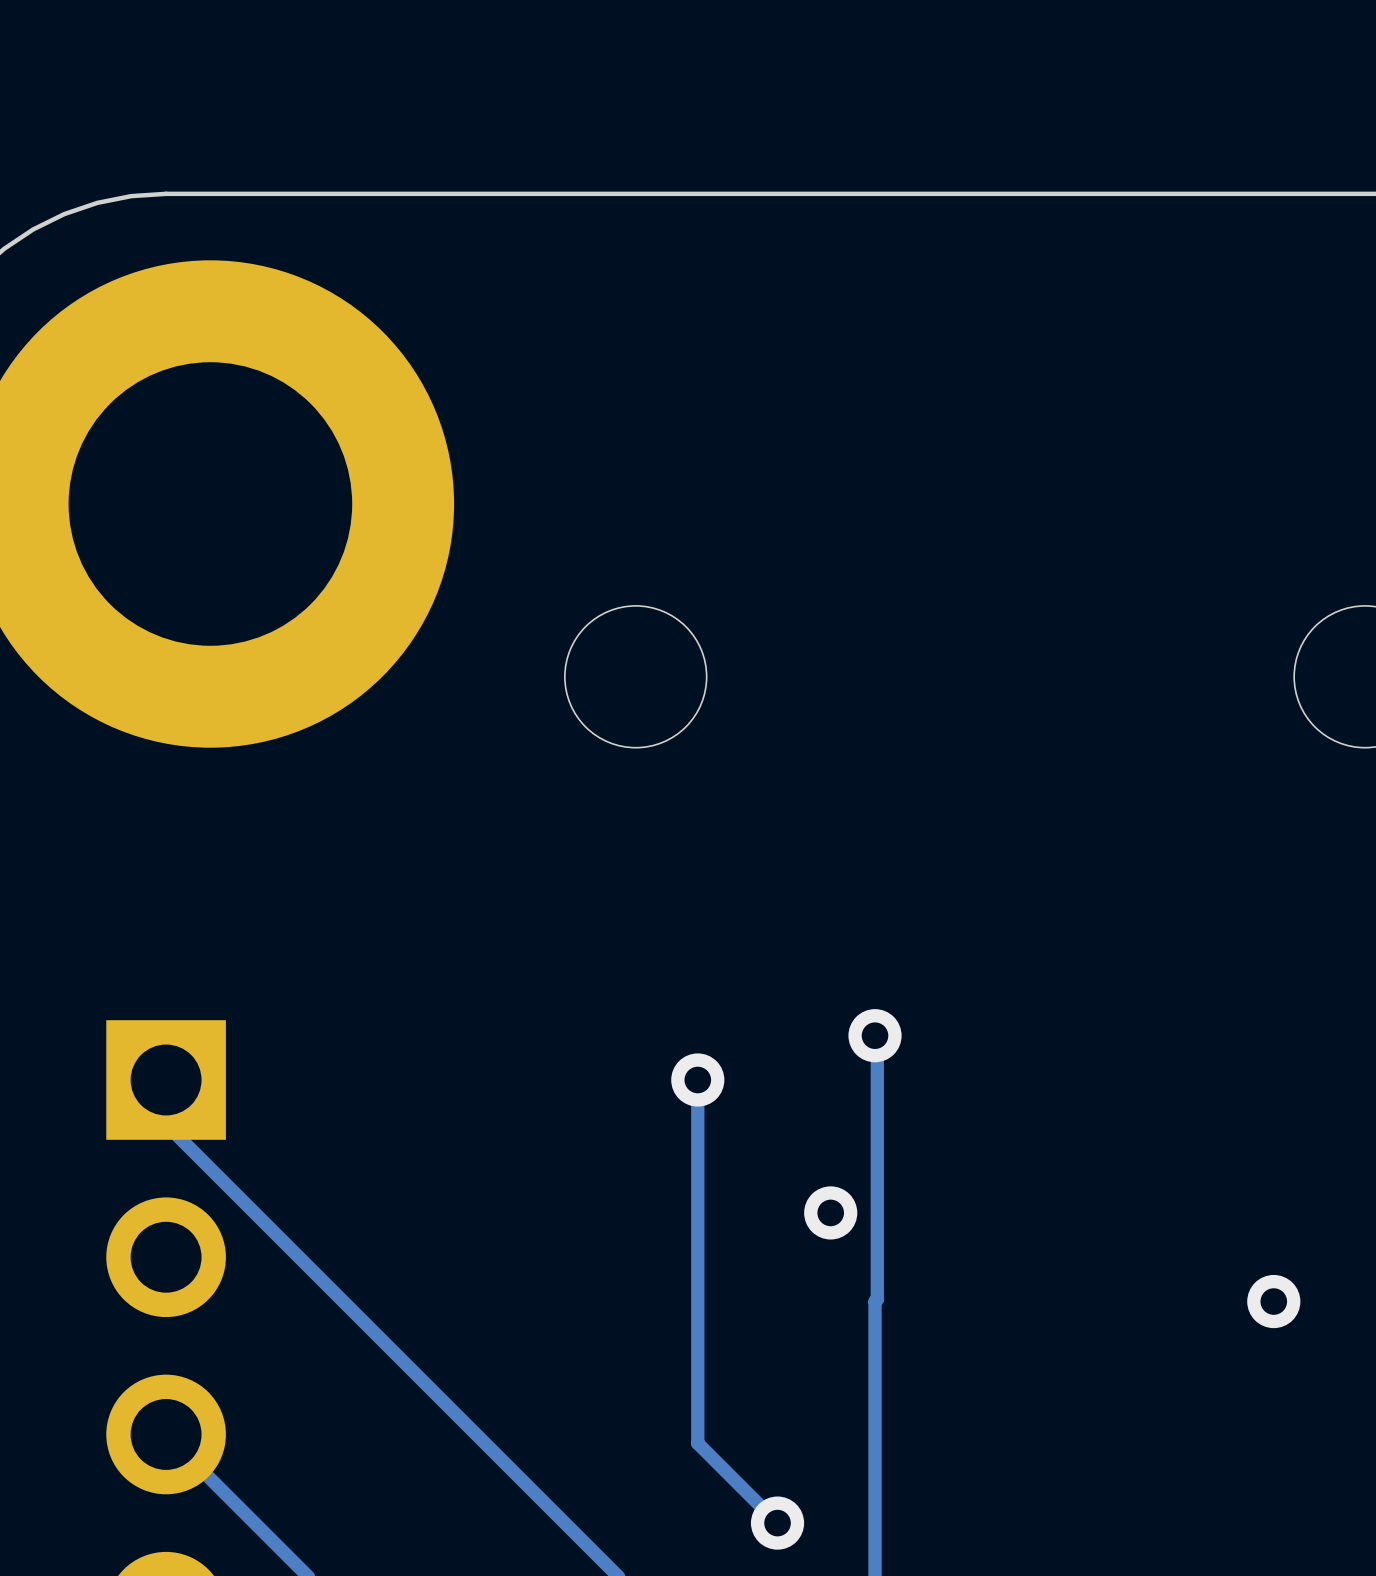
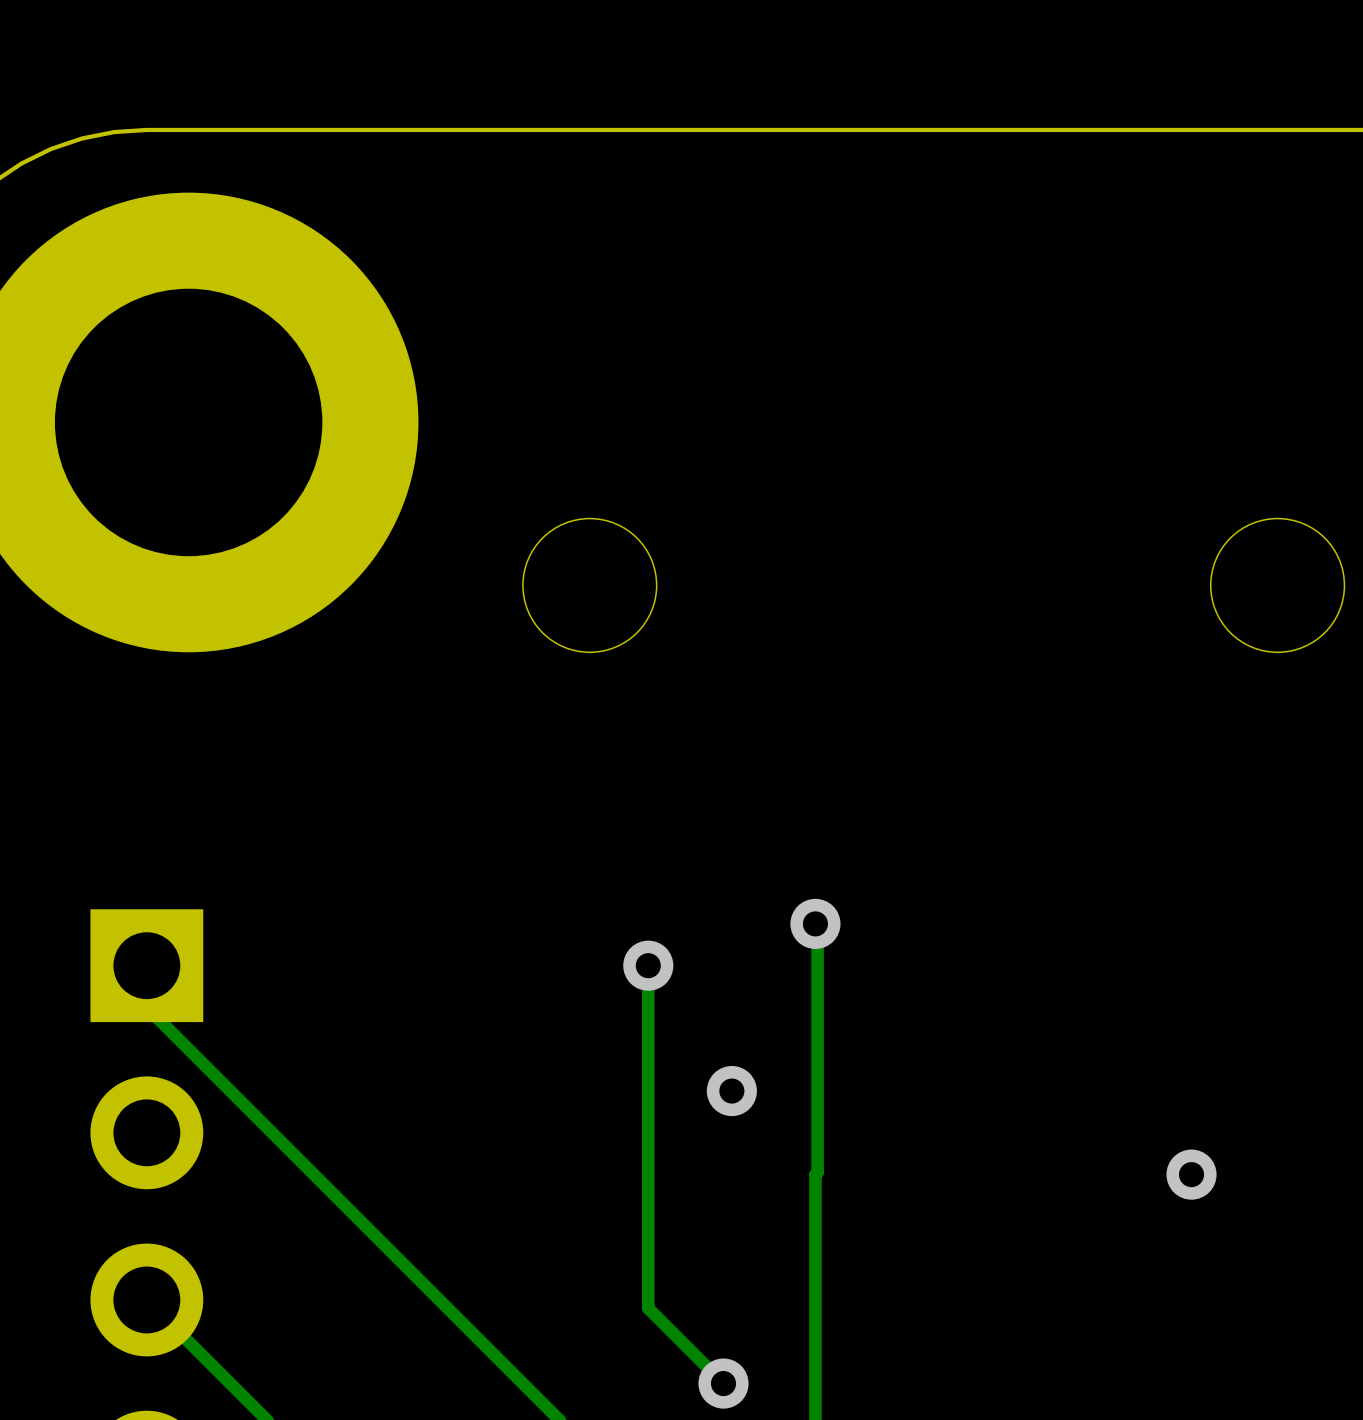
via position: (830, 1212) -> (731, 1091)

